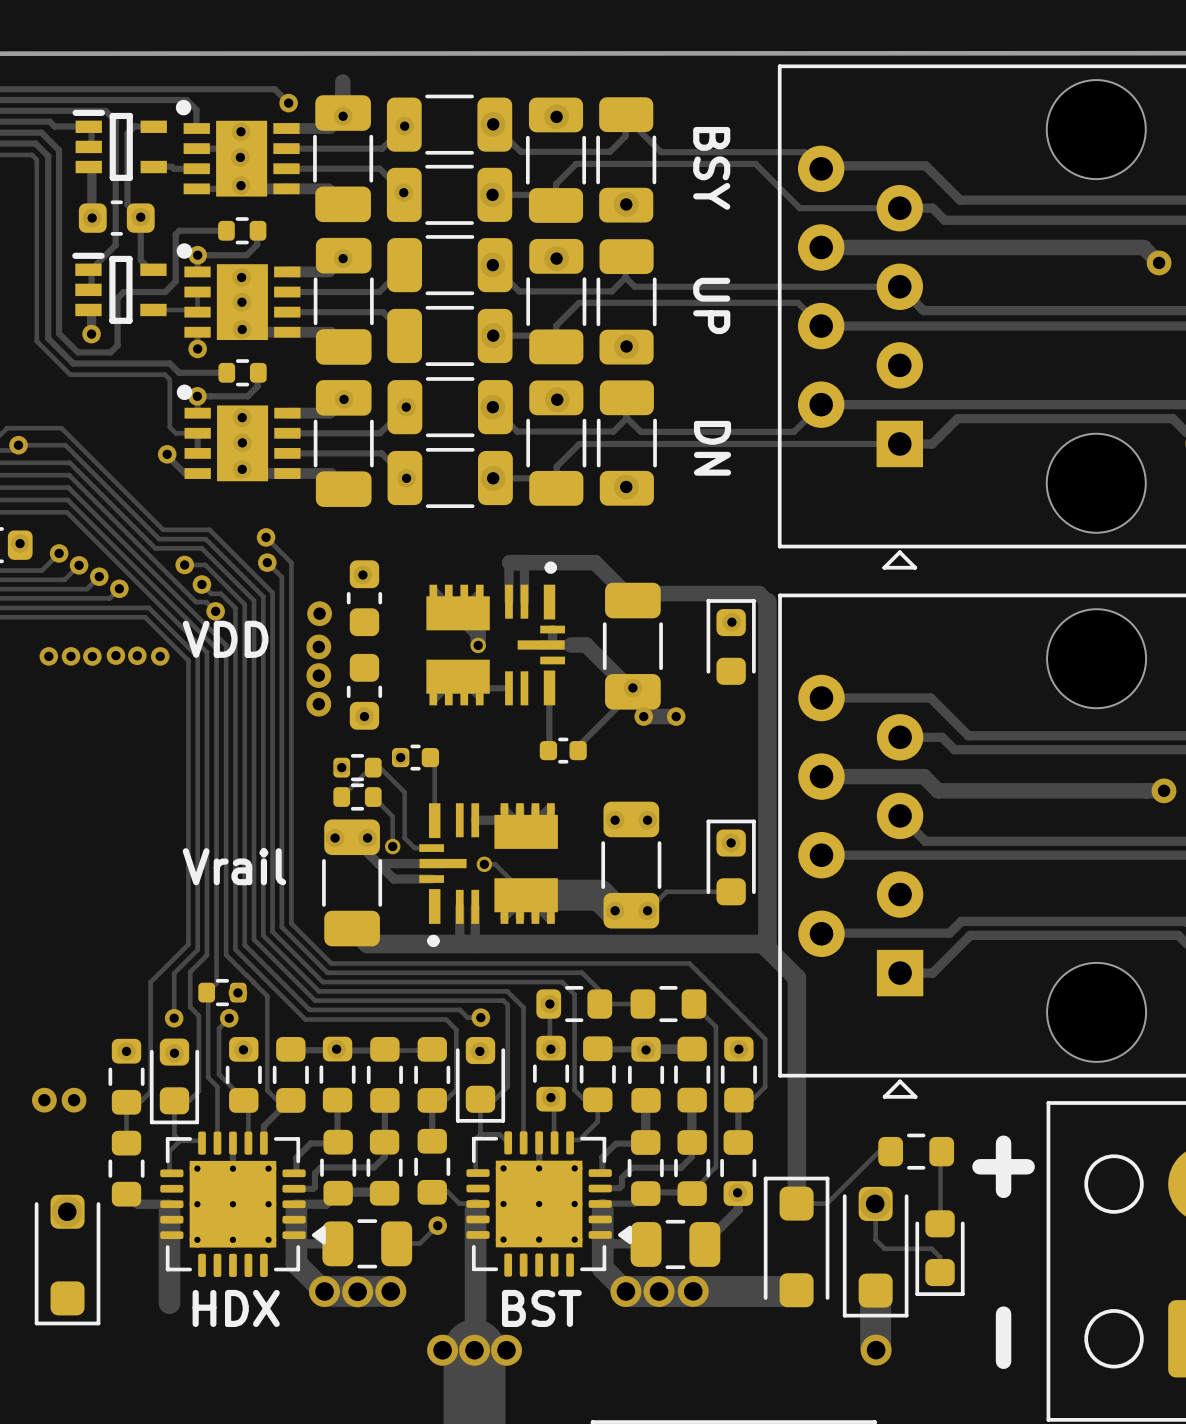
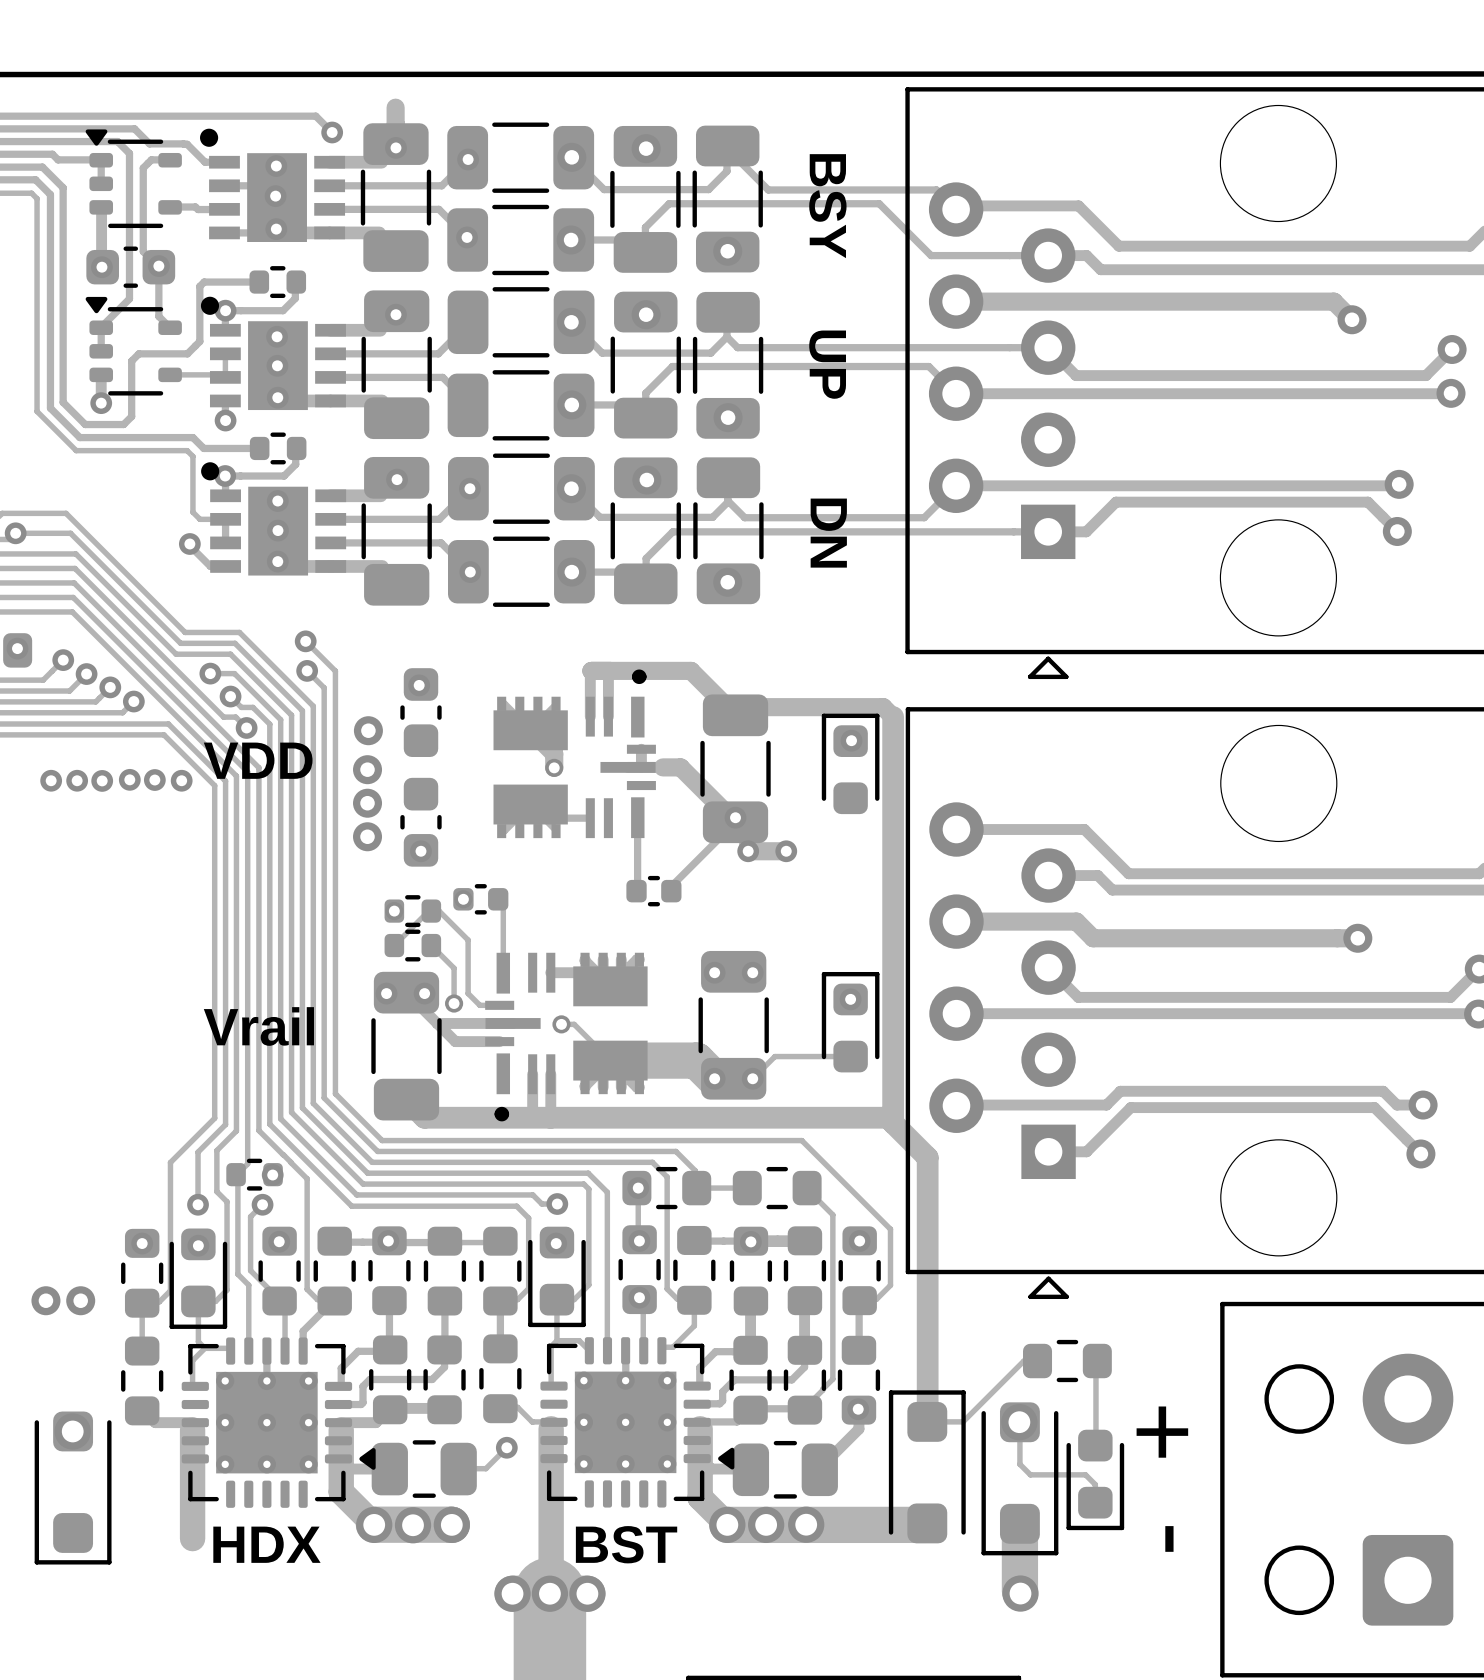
track: (120, 100) (186, 100) (196, 109) (196, 128) -> (134, 128) (149, 143) (183, 143)
part footprint: [72, 109, 167, 181] -> [85, 129, 182, 229]
track: none -> (184, 144) (187, 144) (205, 162) (224, 162)
part footprint: [72, 252, 167, 324] -> [85, 296, 182, 396]

